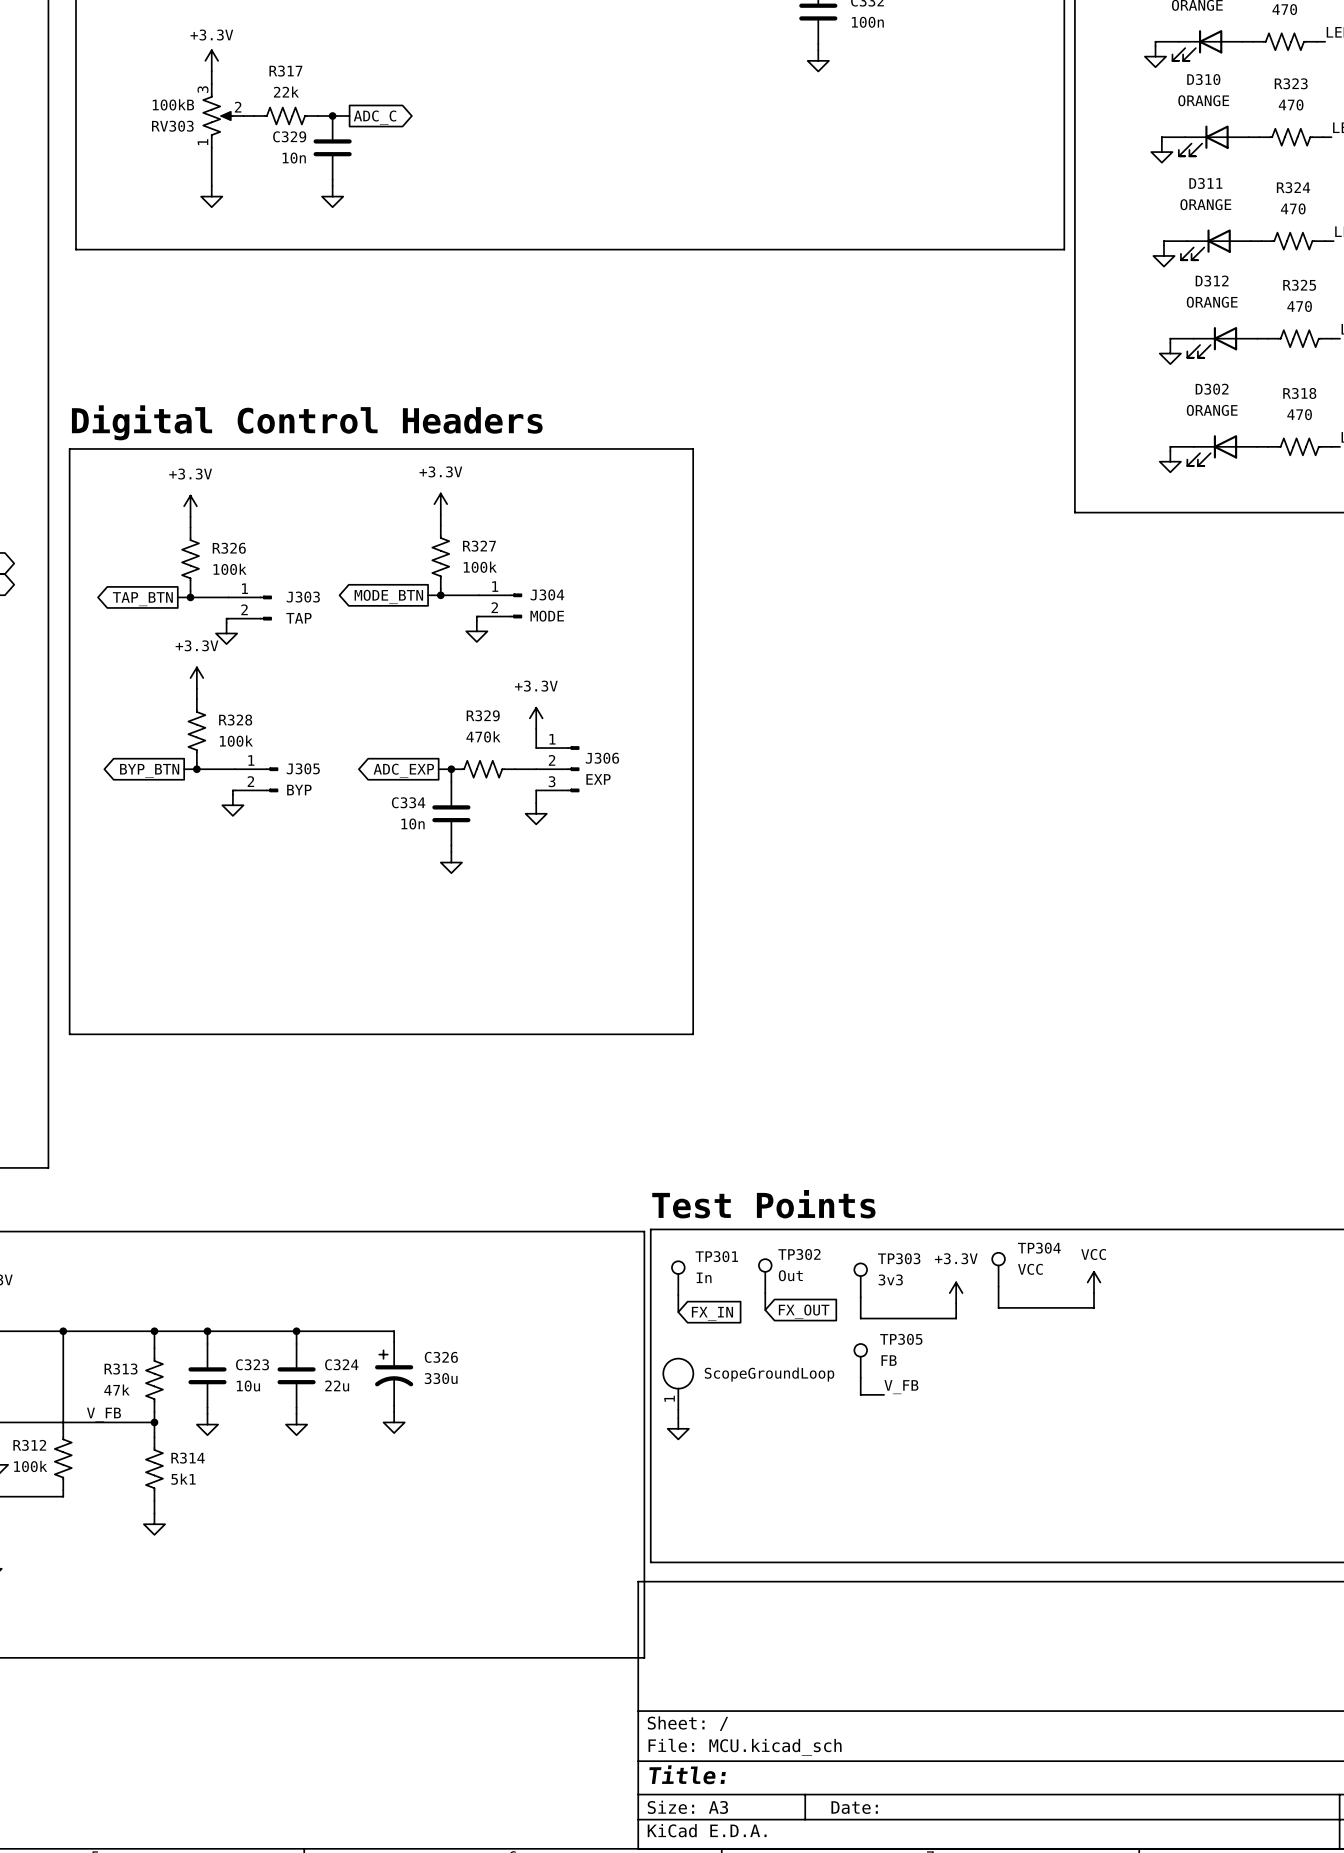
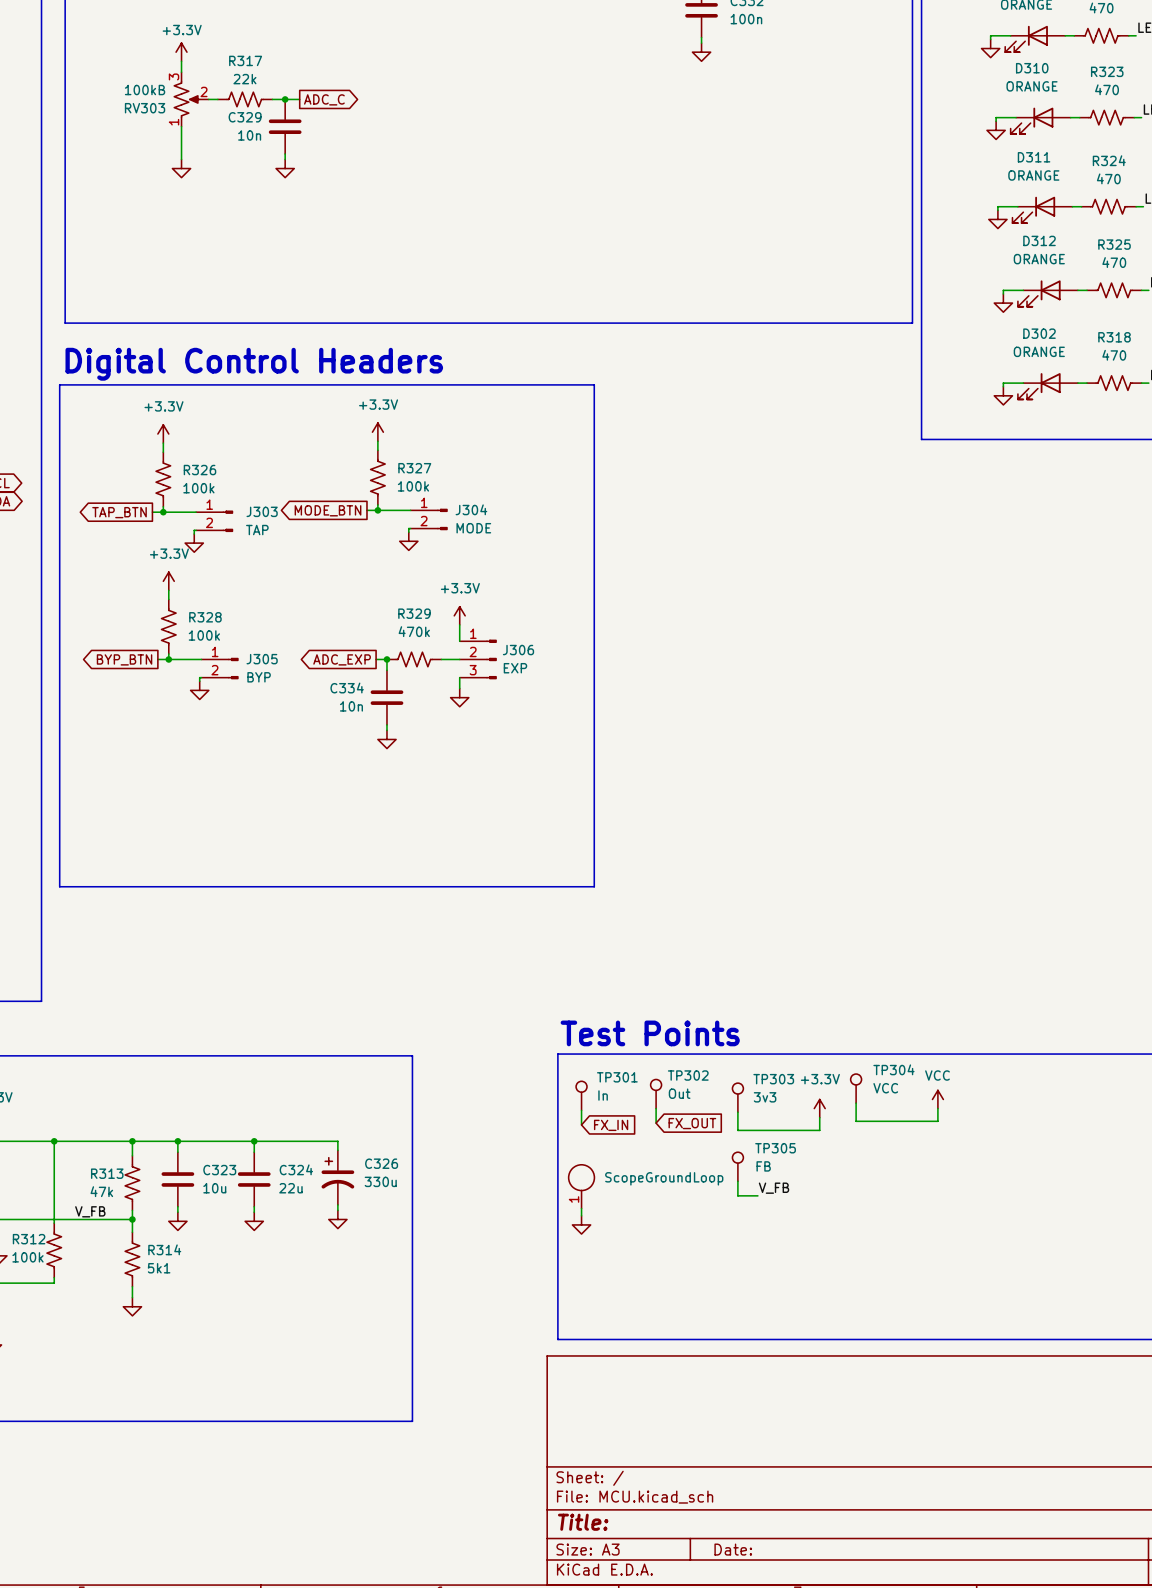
line: (75, 249) (1064, 249) -> (65, 214) (65, 323) (912, 323) (912, 214)
line: (481, 1231) (644, 1231) (644, 1657) (481, 1657) -> (412, 1055) (412, 1421)

